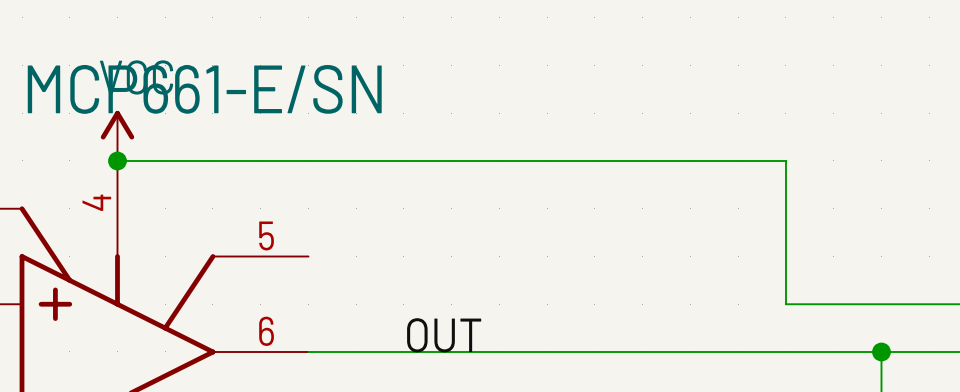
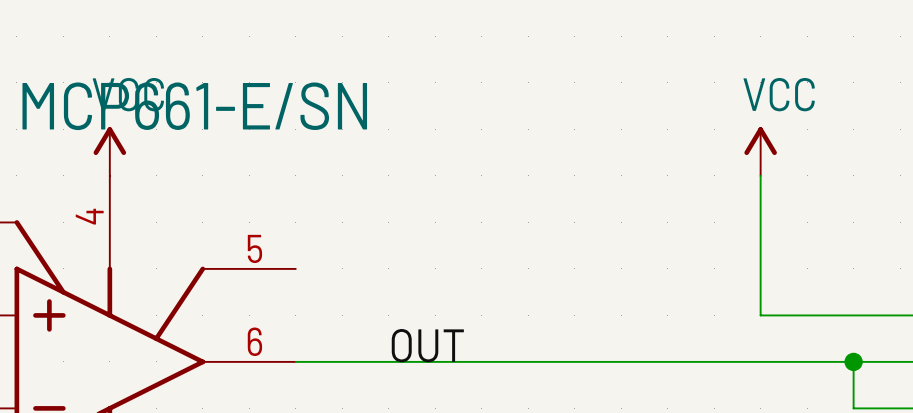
power symbol: none -> VCC (760, 151)
wire: (117, 160) (785, 160) -> none
junction: (117, 160) -> none

